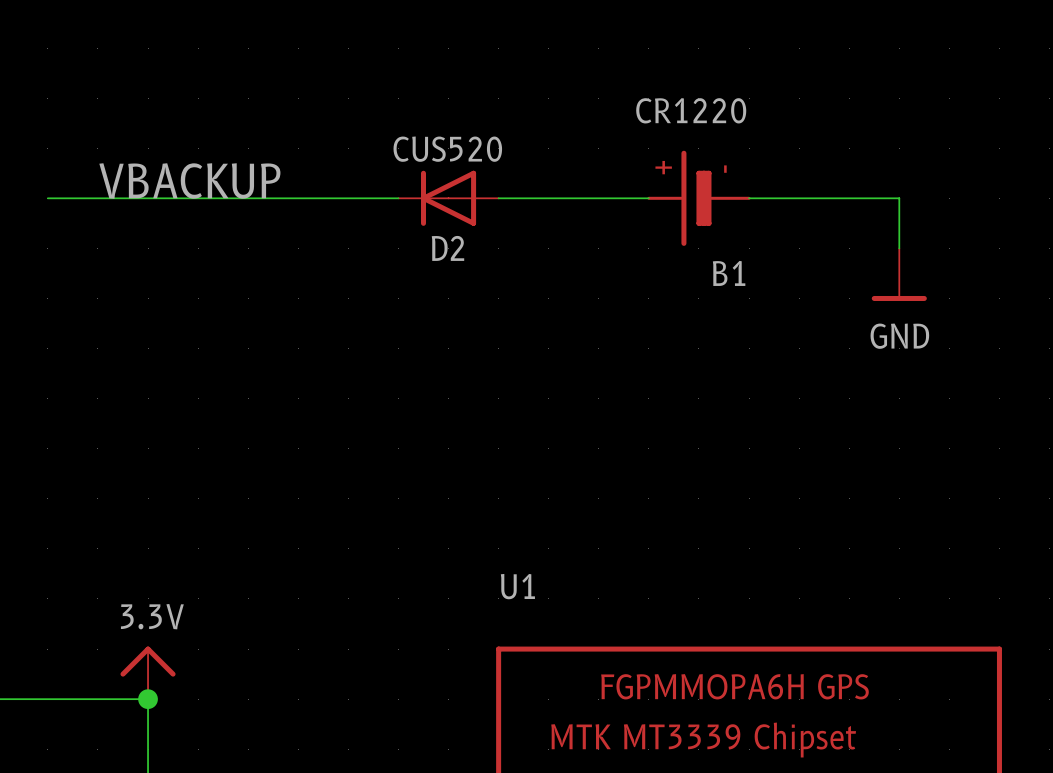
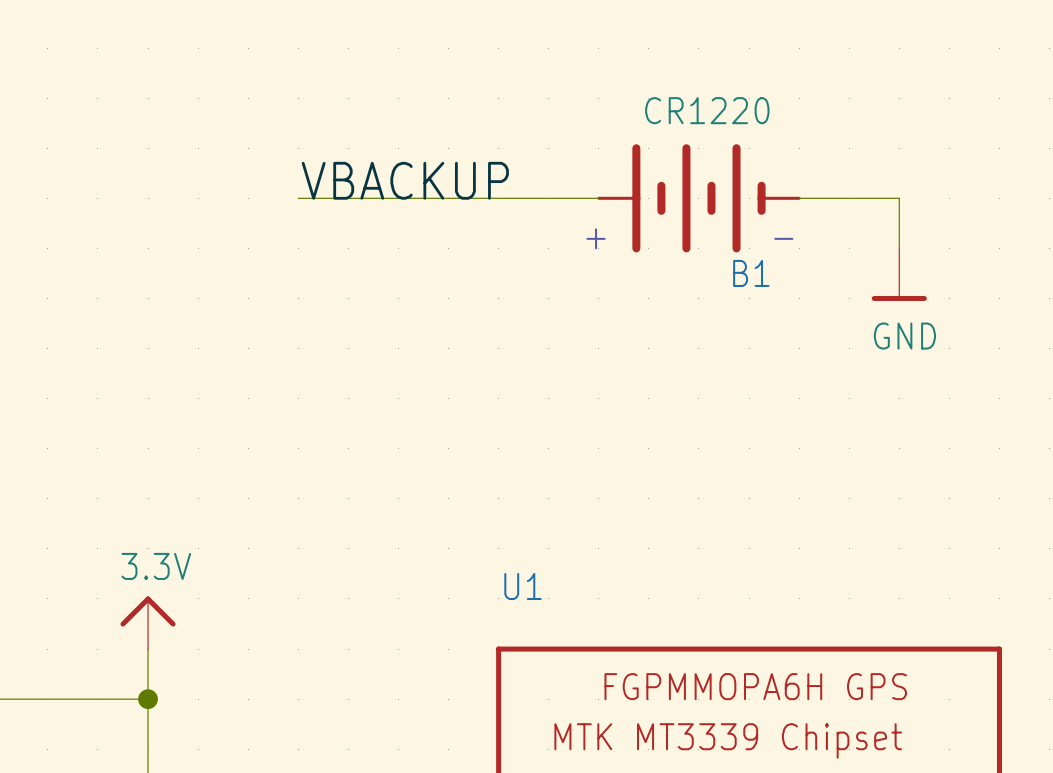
B1 symbol: [647, 150, 751, 246] -> [597, 144, 801, 253]
label position: VBACKUP (189, 181) -> VBACKUP (405, 180)
wire: (47, 198) (298, 198) -> none
D2: CUS520 (448, 198) -> none
power symbol position: 3.3V (148, 672) -> 3.3V (148, 622)

